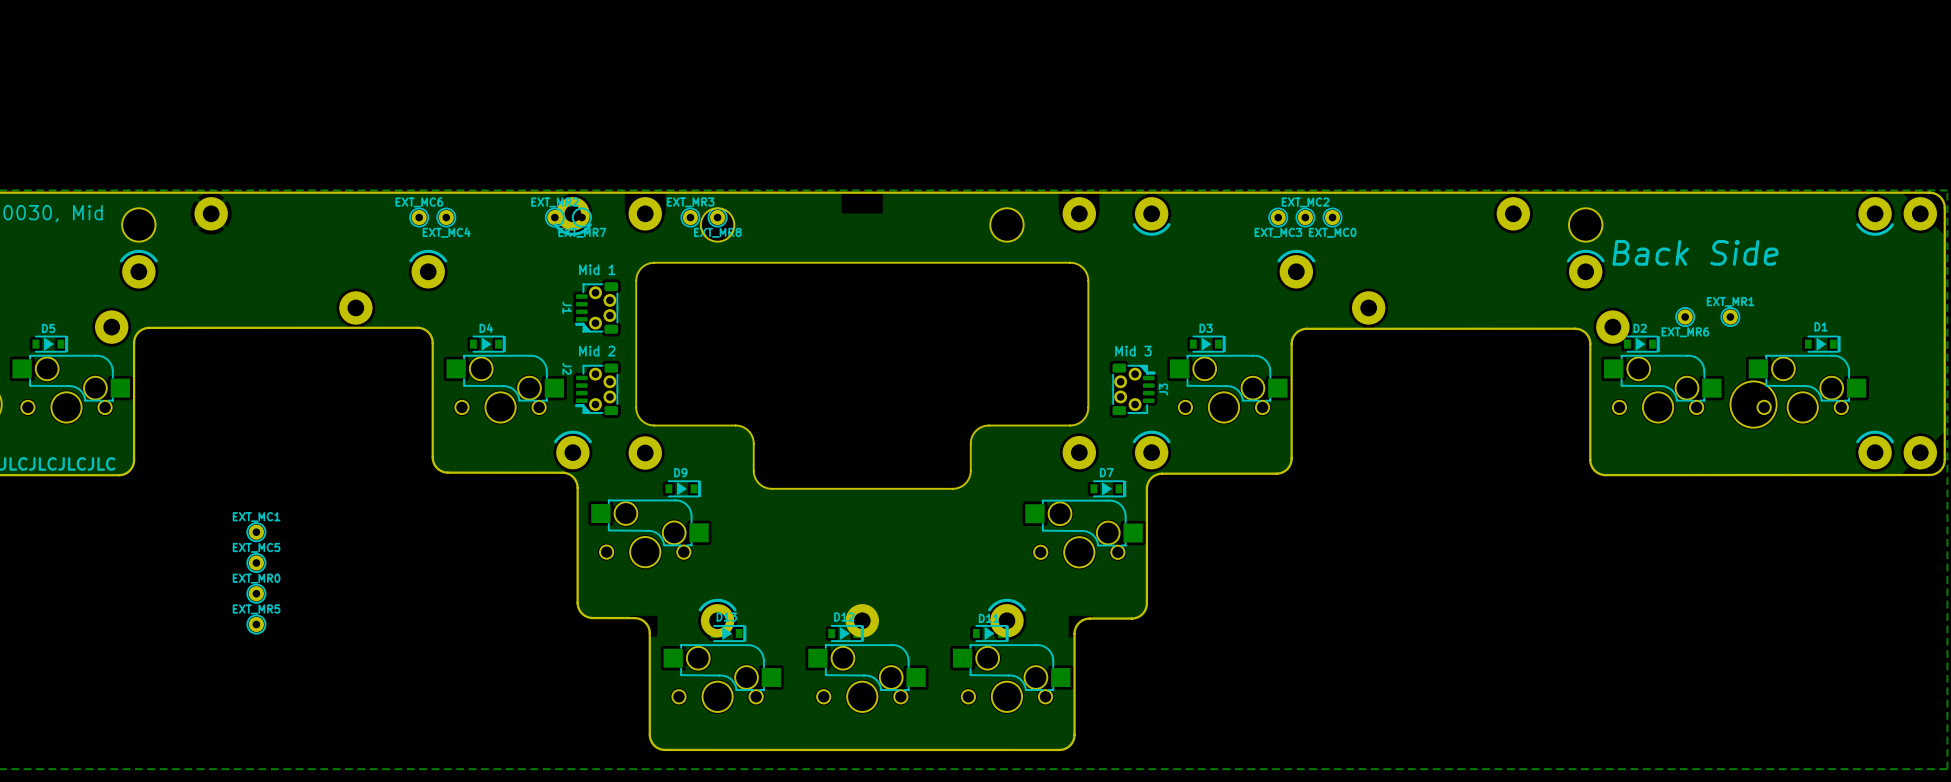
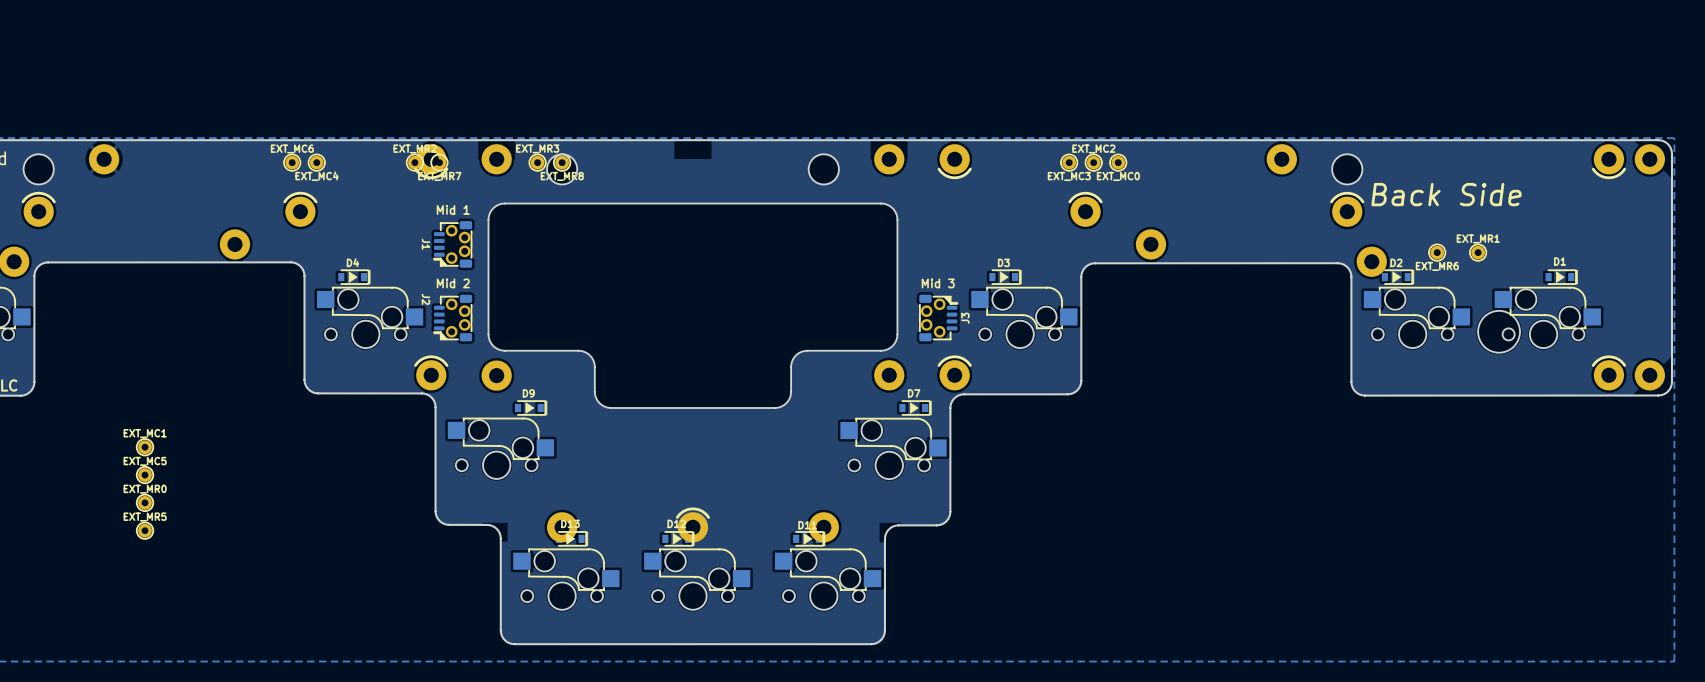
part side: bottom (717, 618) -> top (562, 527)
part side: bottom (1006, 618) -> top (823, 527)
part side: top (862, 620) -> bottom (692, 524)

